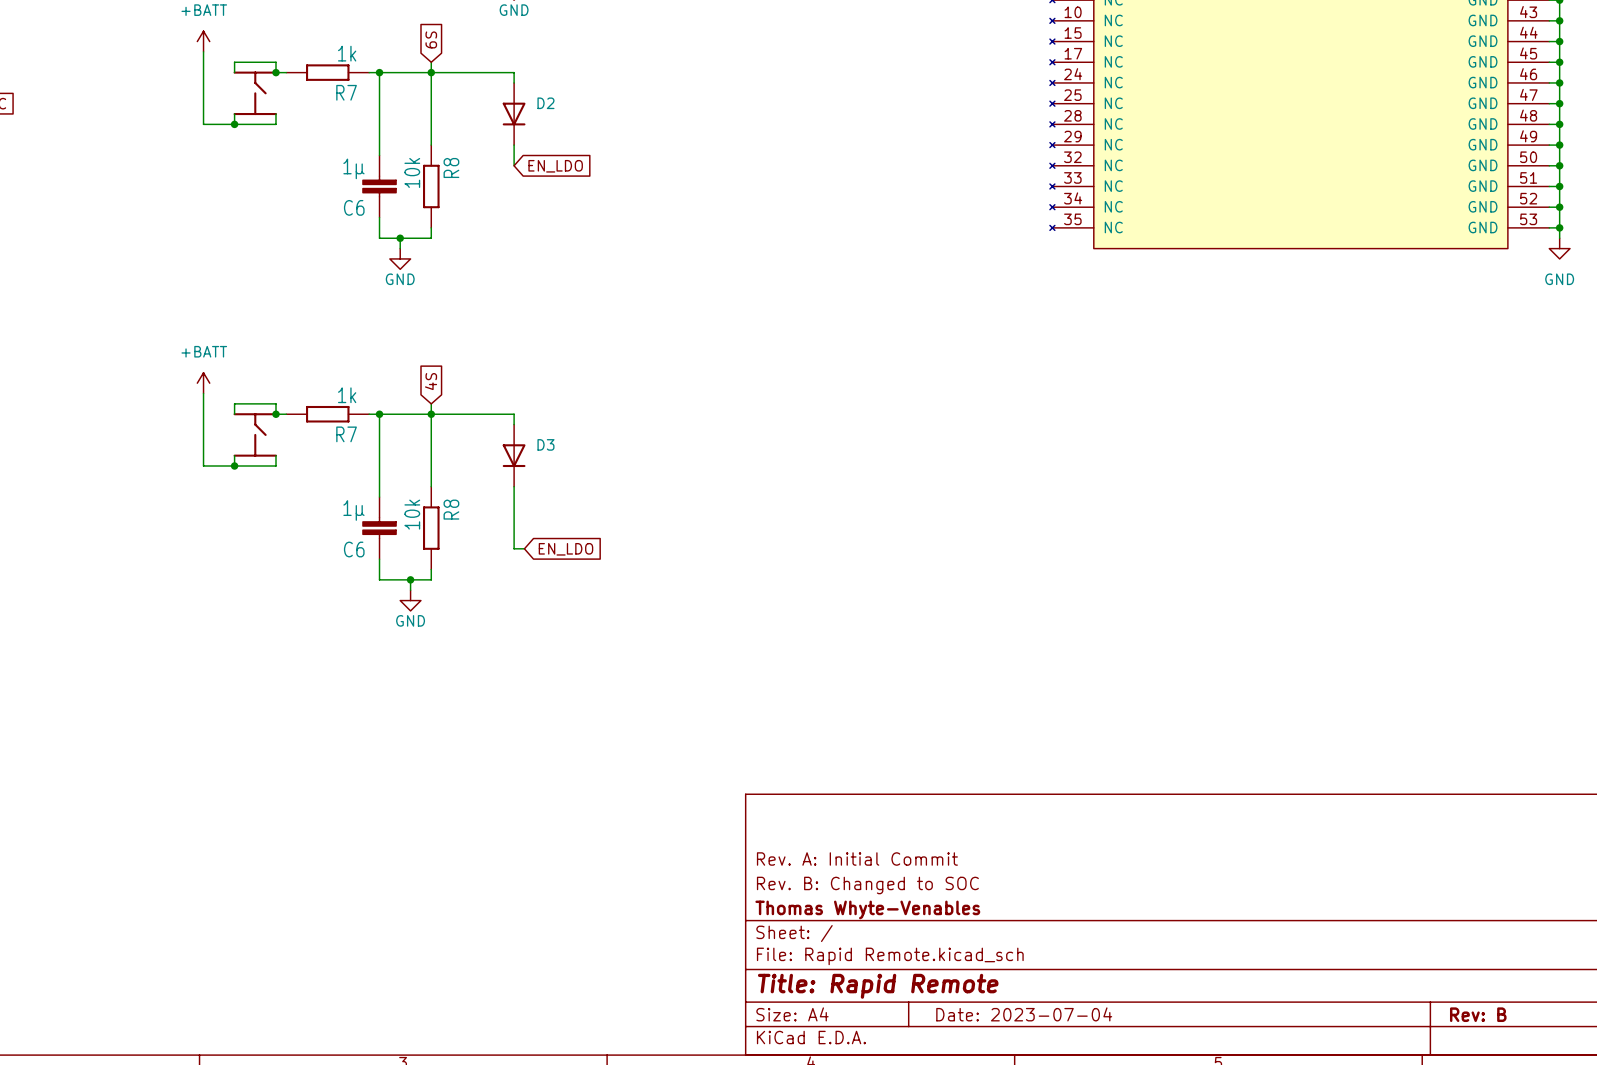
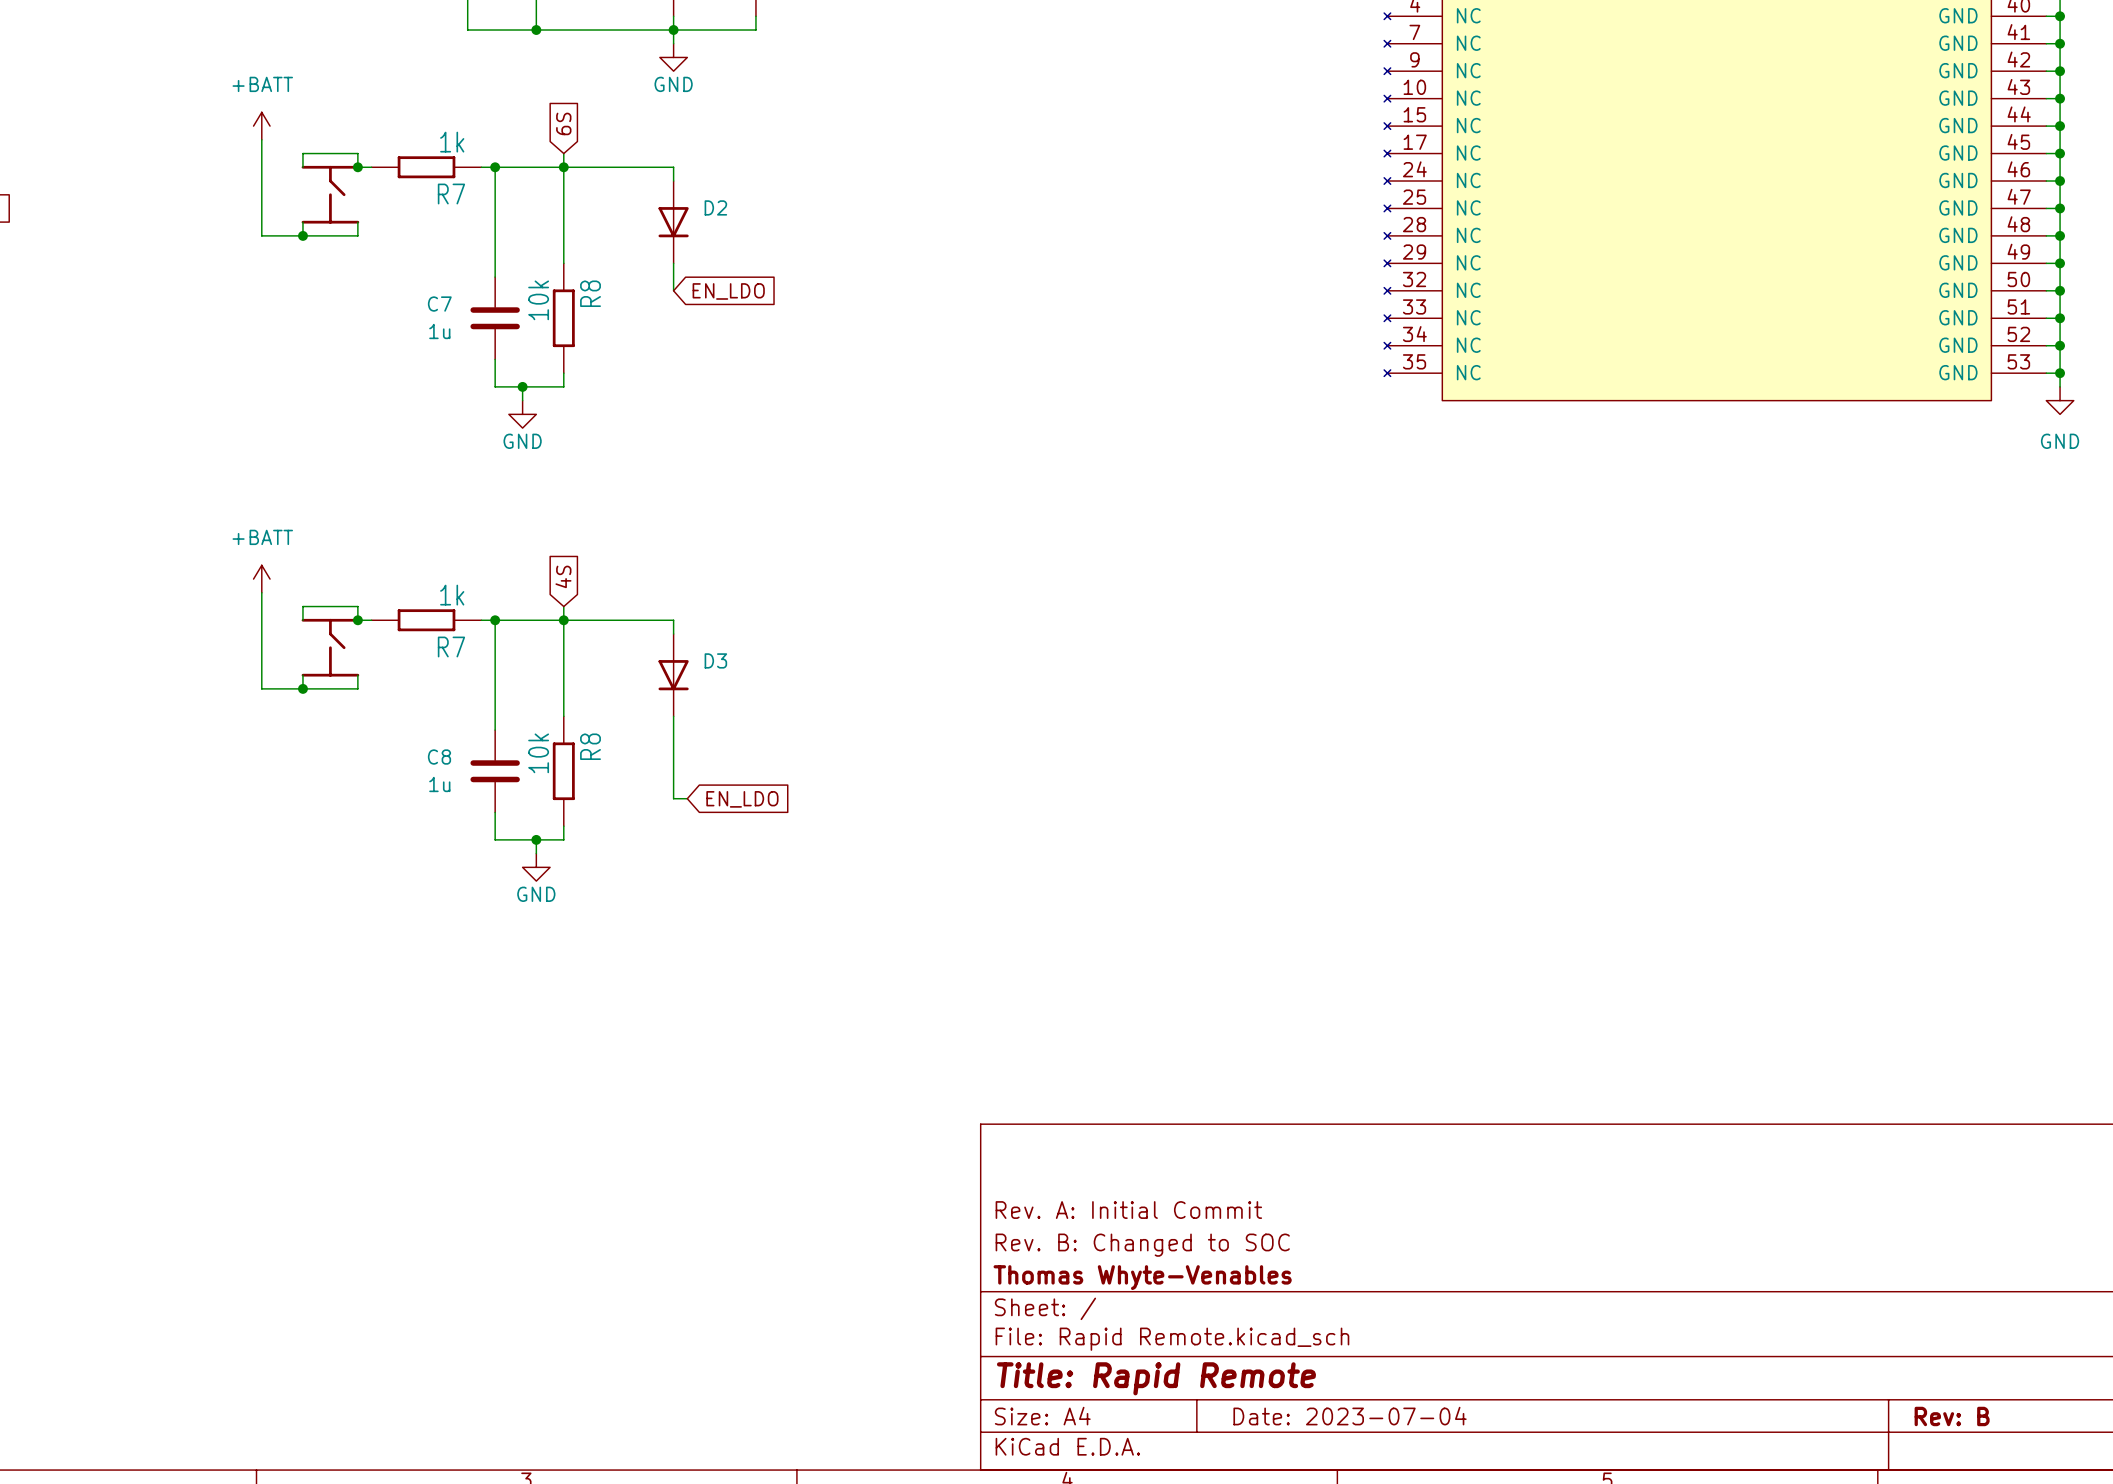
C6: 1µ (379, 186) -> none
C7: none -> 1u (495, 318)
C6: 1µ (379, 528) -> none
C8: none -> 1u (495, 771)

